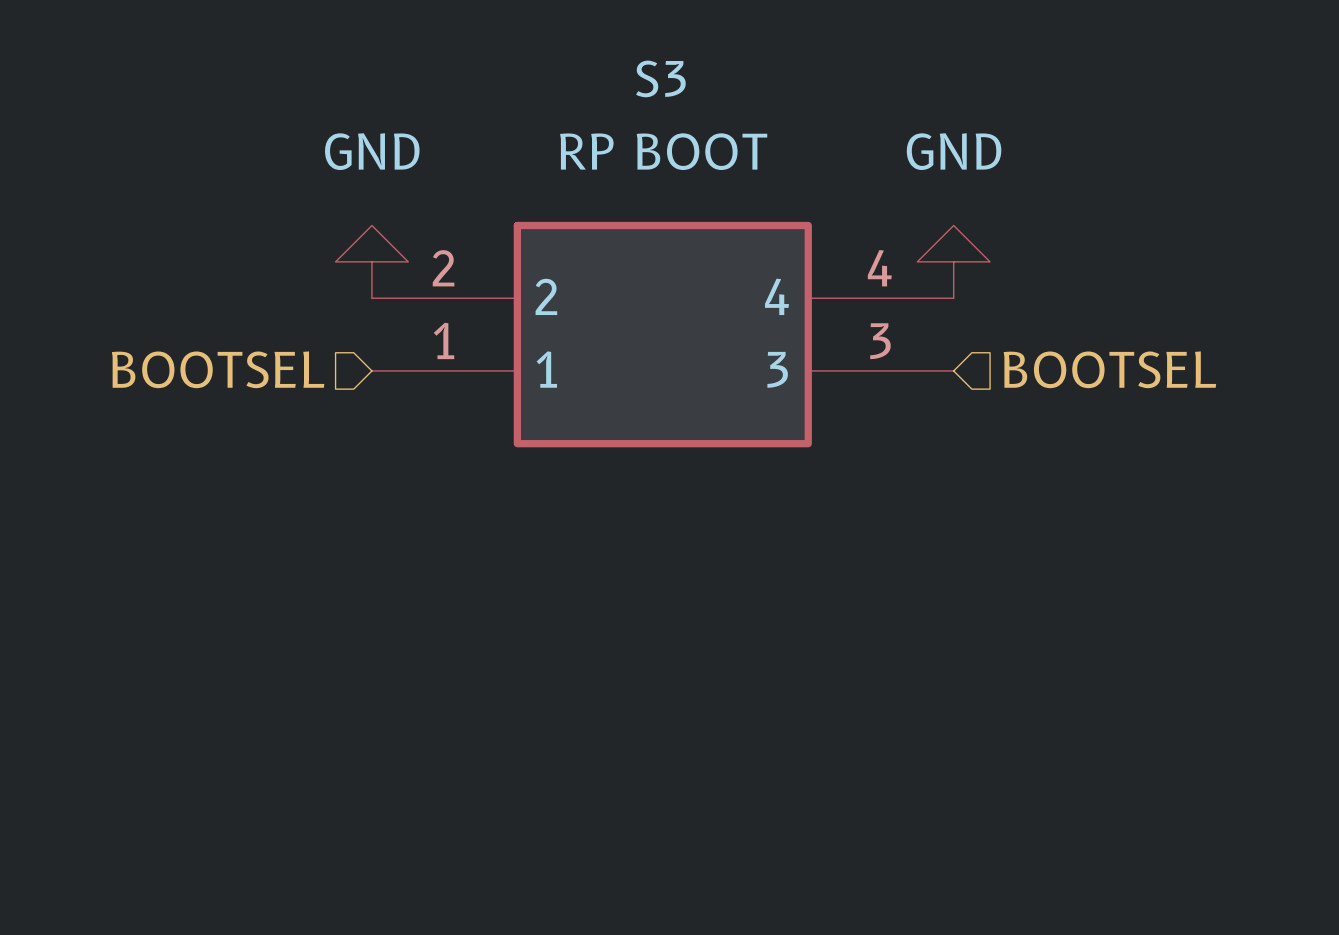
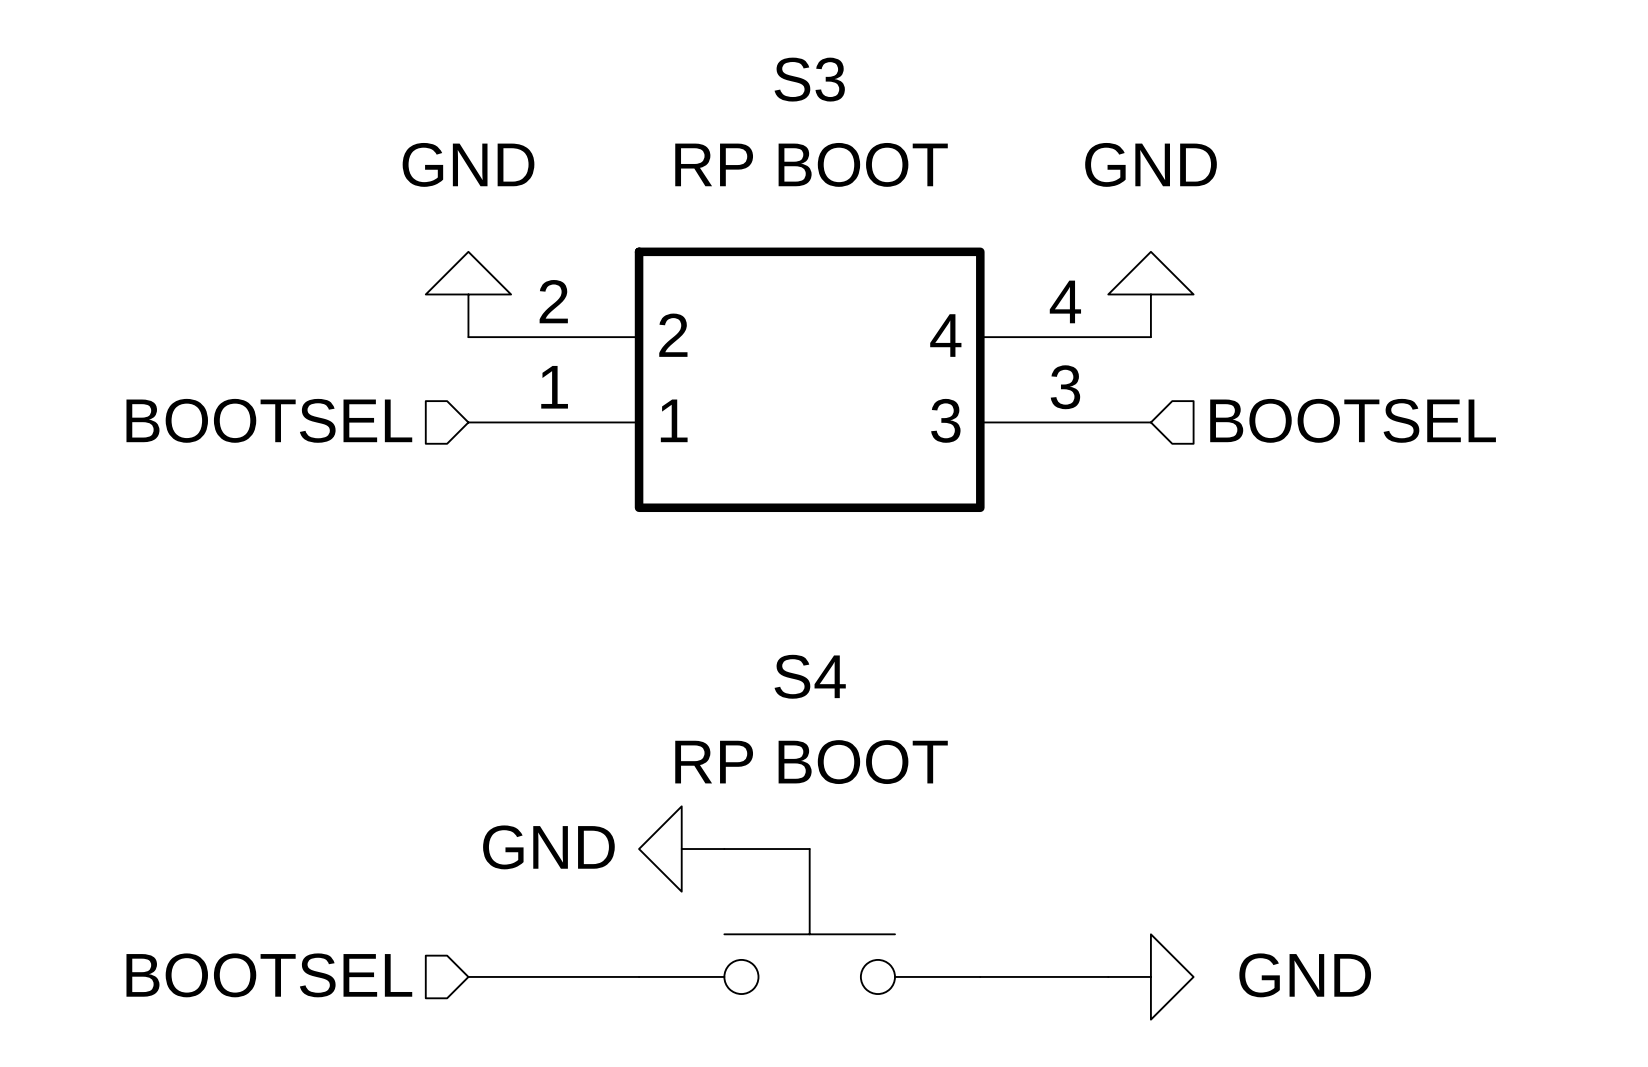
power symbol: none -> GND (681, 849)
S4: none -> RP BOOT (809, 921)
hierarchical label: none -> BOOTSEL (269, 975)
wire: none -> (468, 976) (639, 976)
wire: none -> (980, 976) (1108, 976)
power symbol: none -> GND (1150, 976)

